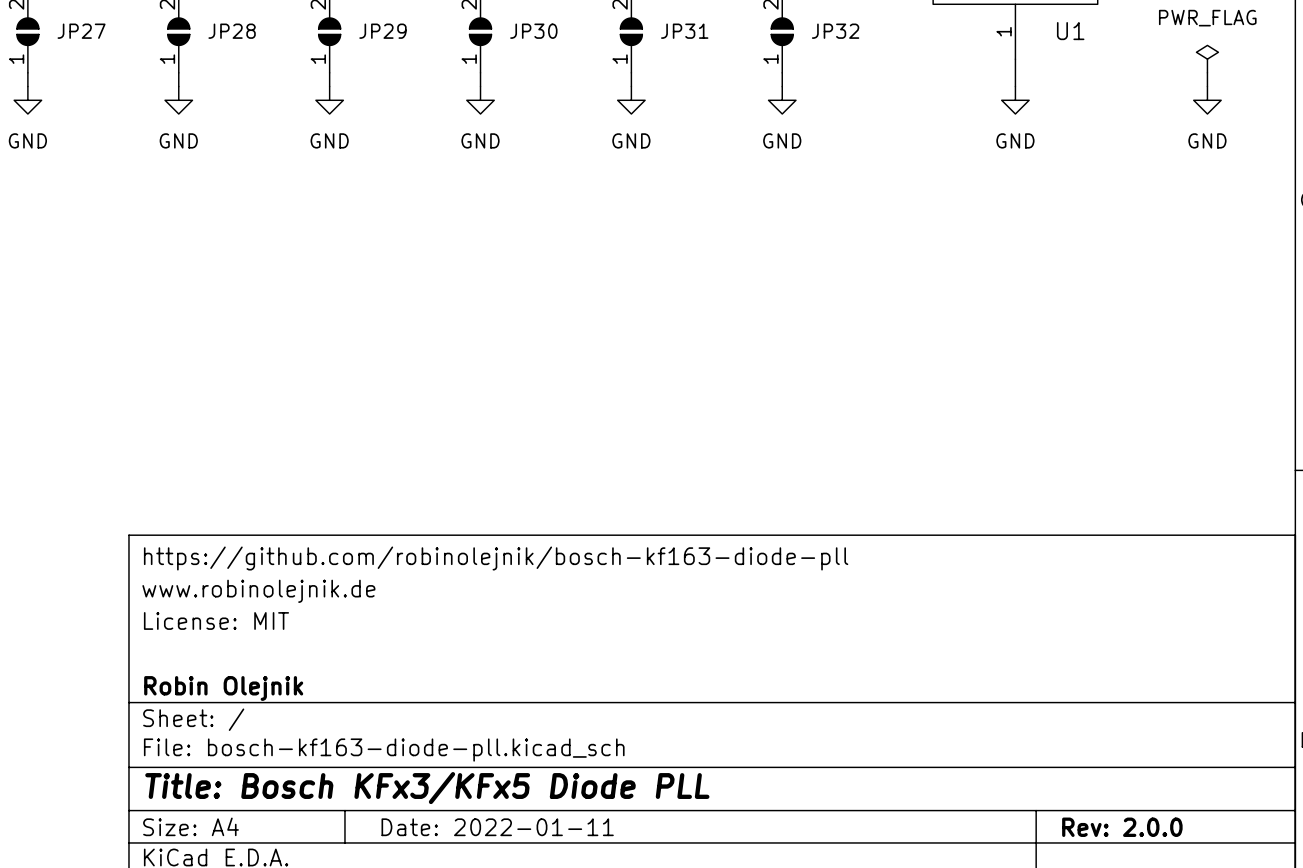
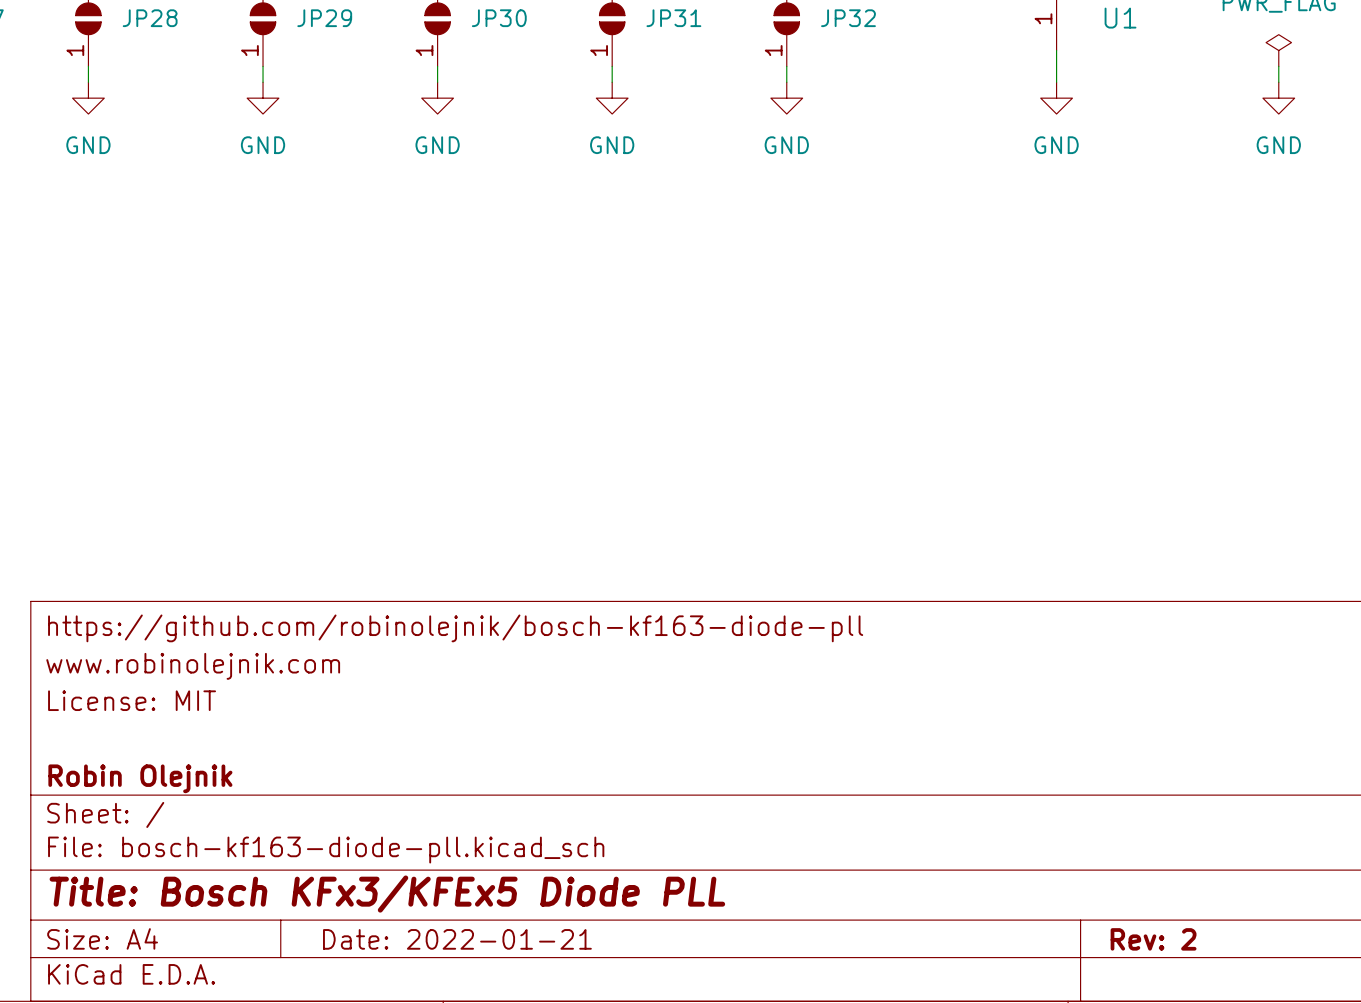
title block: www.robinolejnik.de (258, 591) -> www.robinolejnik.com (193, 666)
title block: Title: Bosch KFx3/KFx5 Diode PLL (427, 788) -> Title: Bosch KFx3/KFEx5 Diode PLL (387, 894)
title block: Date: 2022-01-11 (497, 827) -> Date: 2022-01-21 (457, 939)
title block: Rev: 2.0.0 (1122, 827) -> Rev: 2 (1153, 939)

